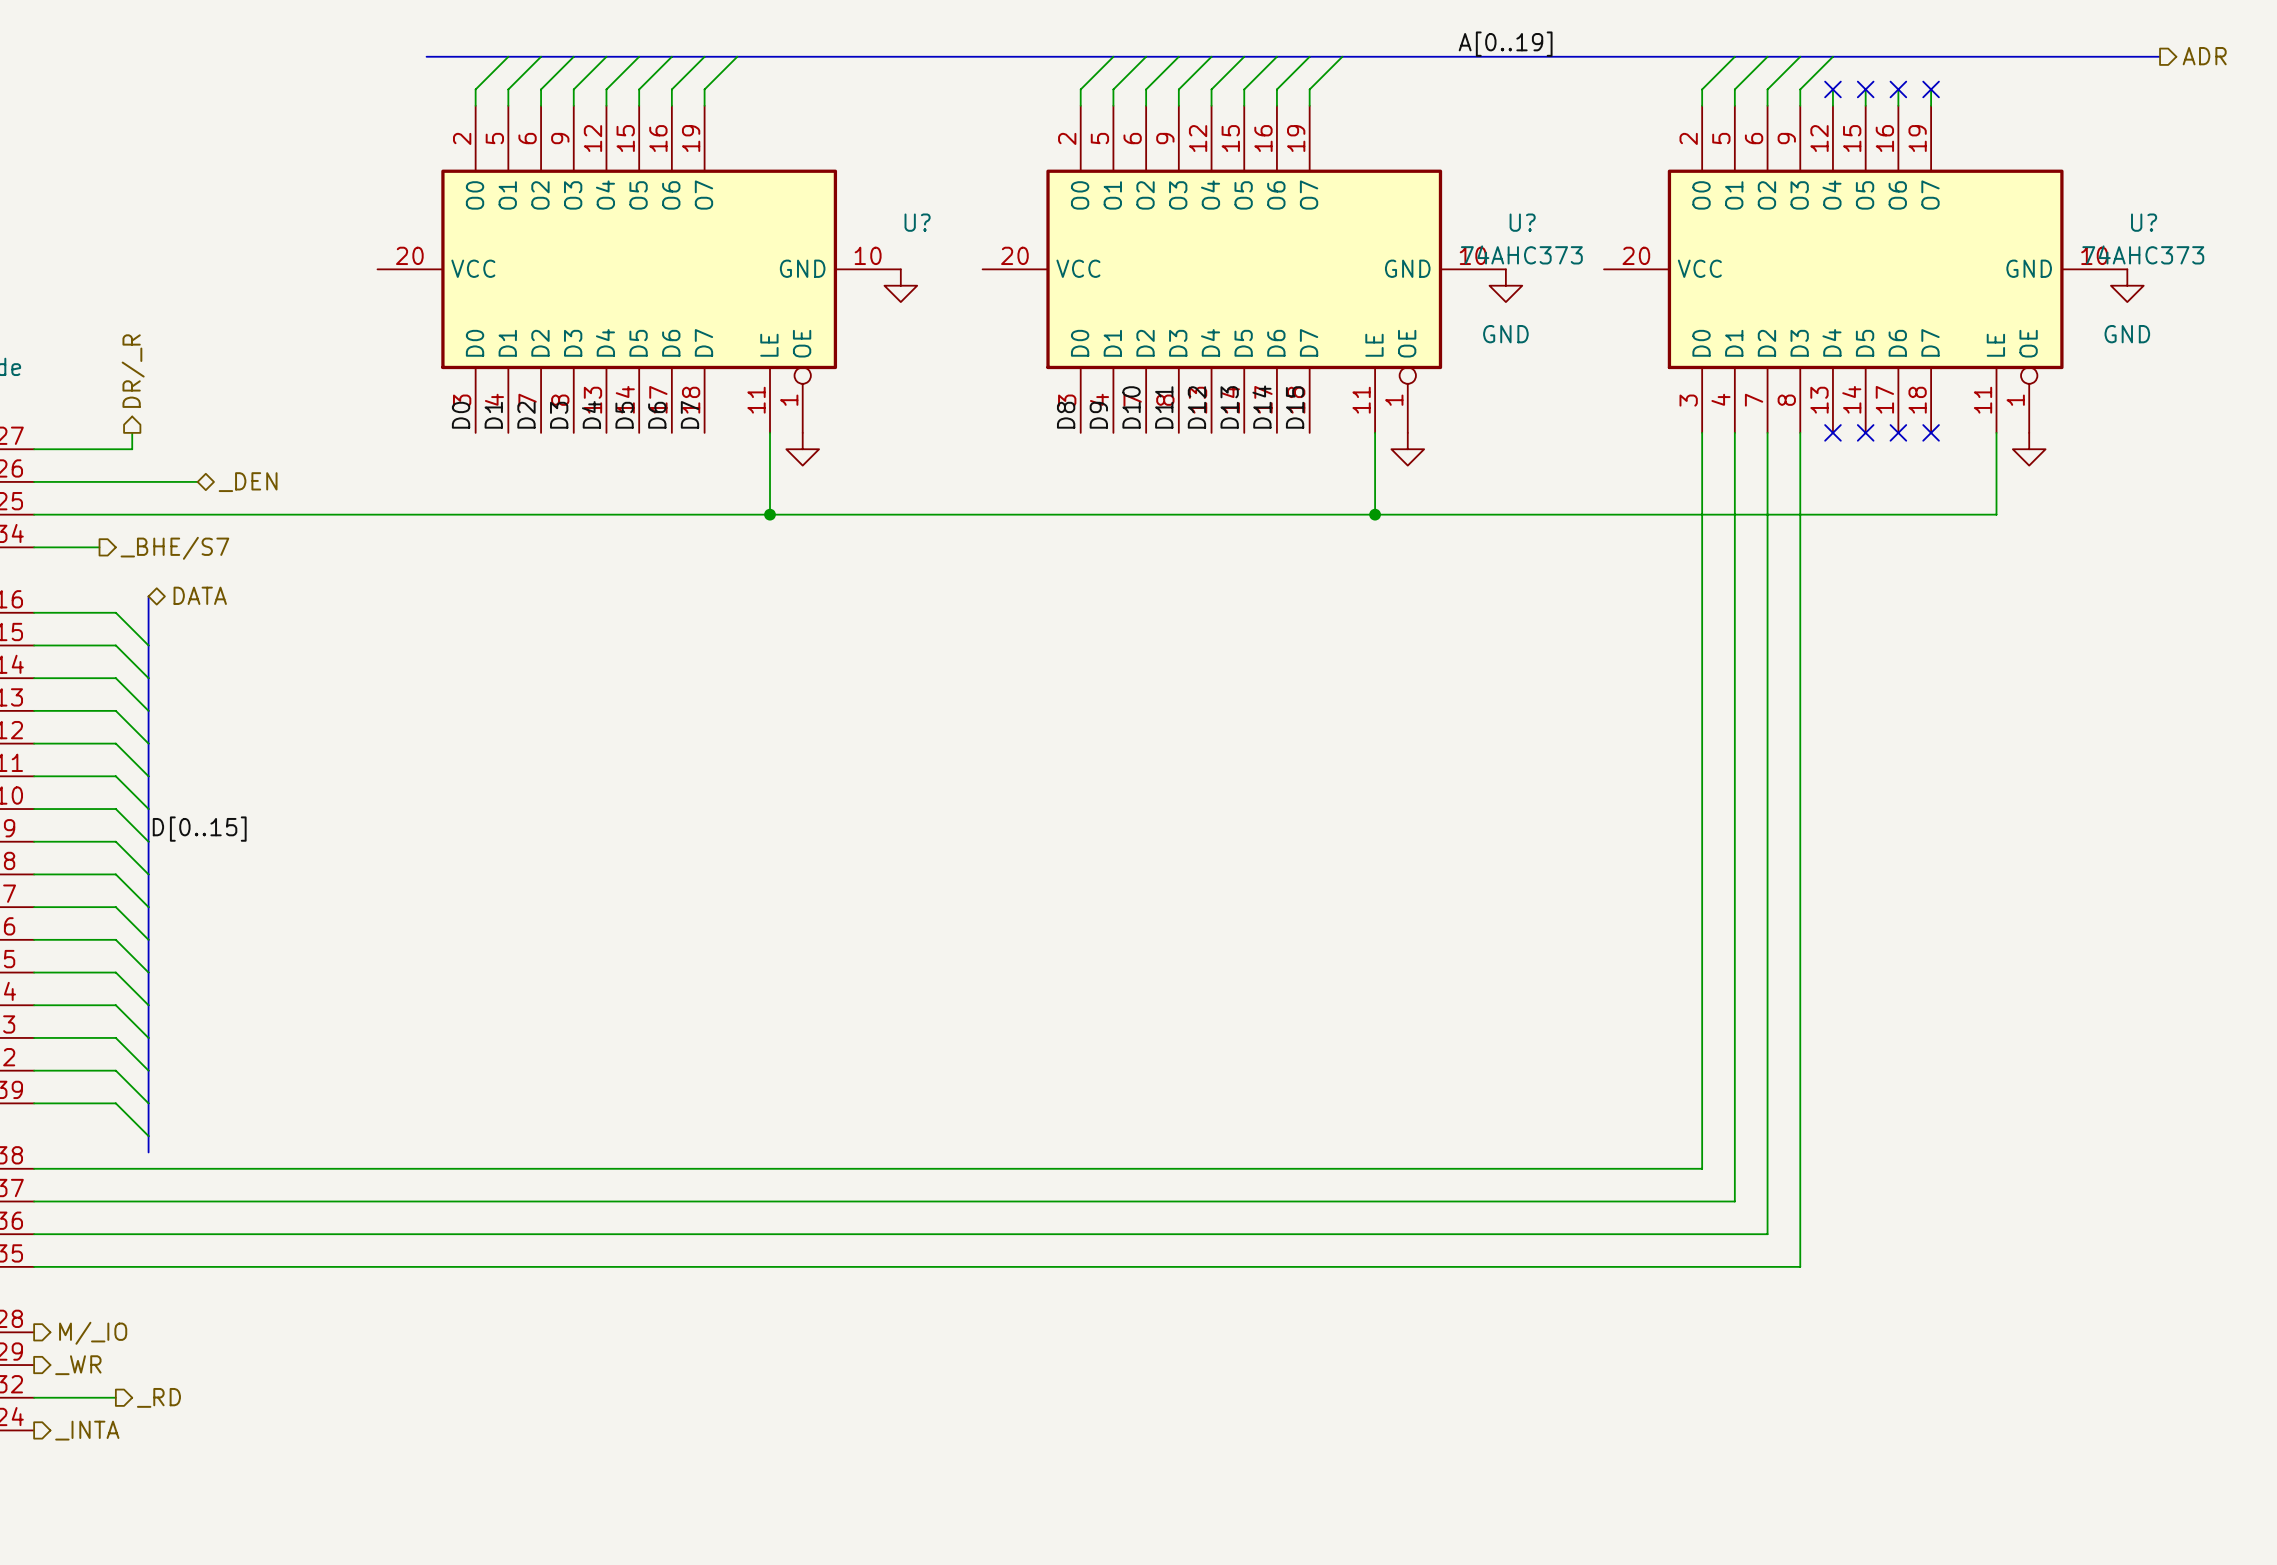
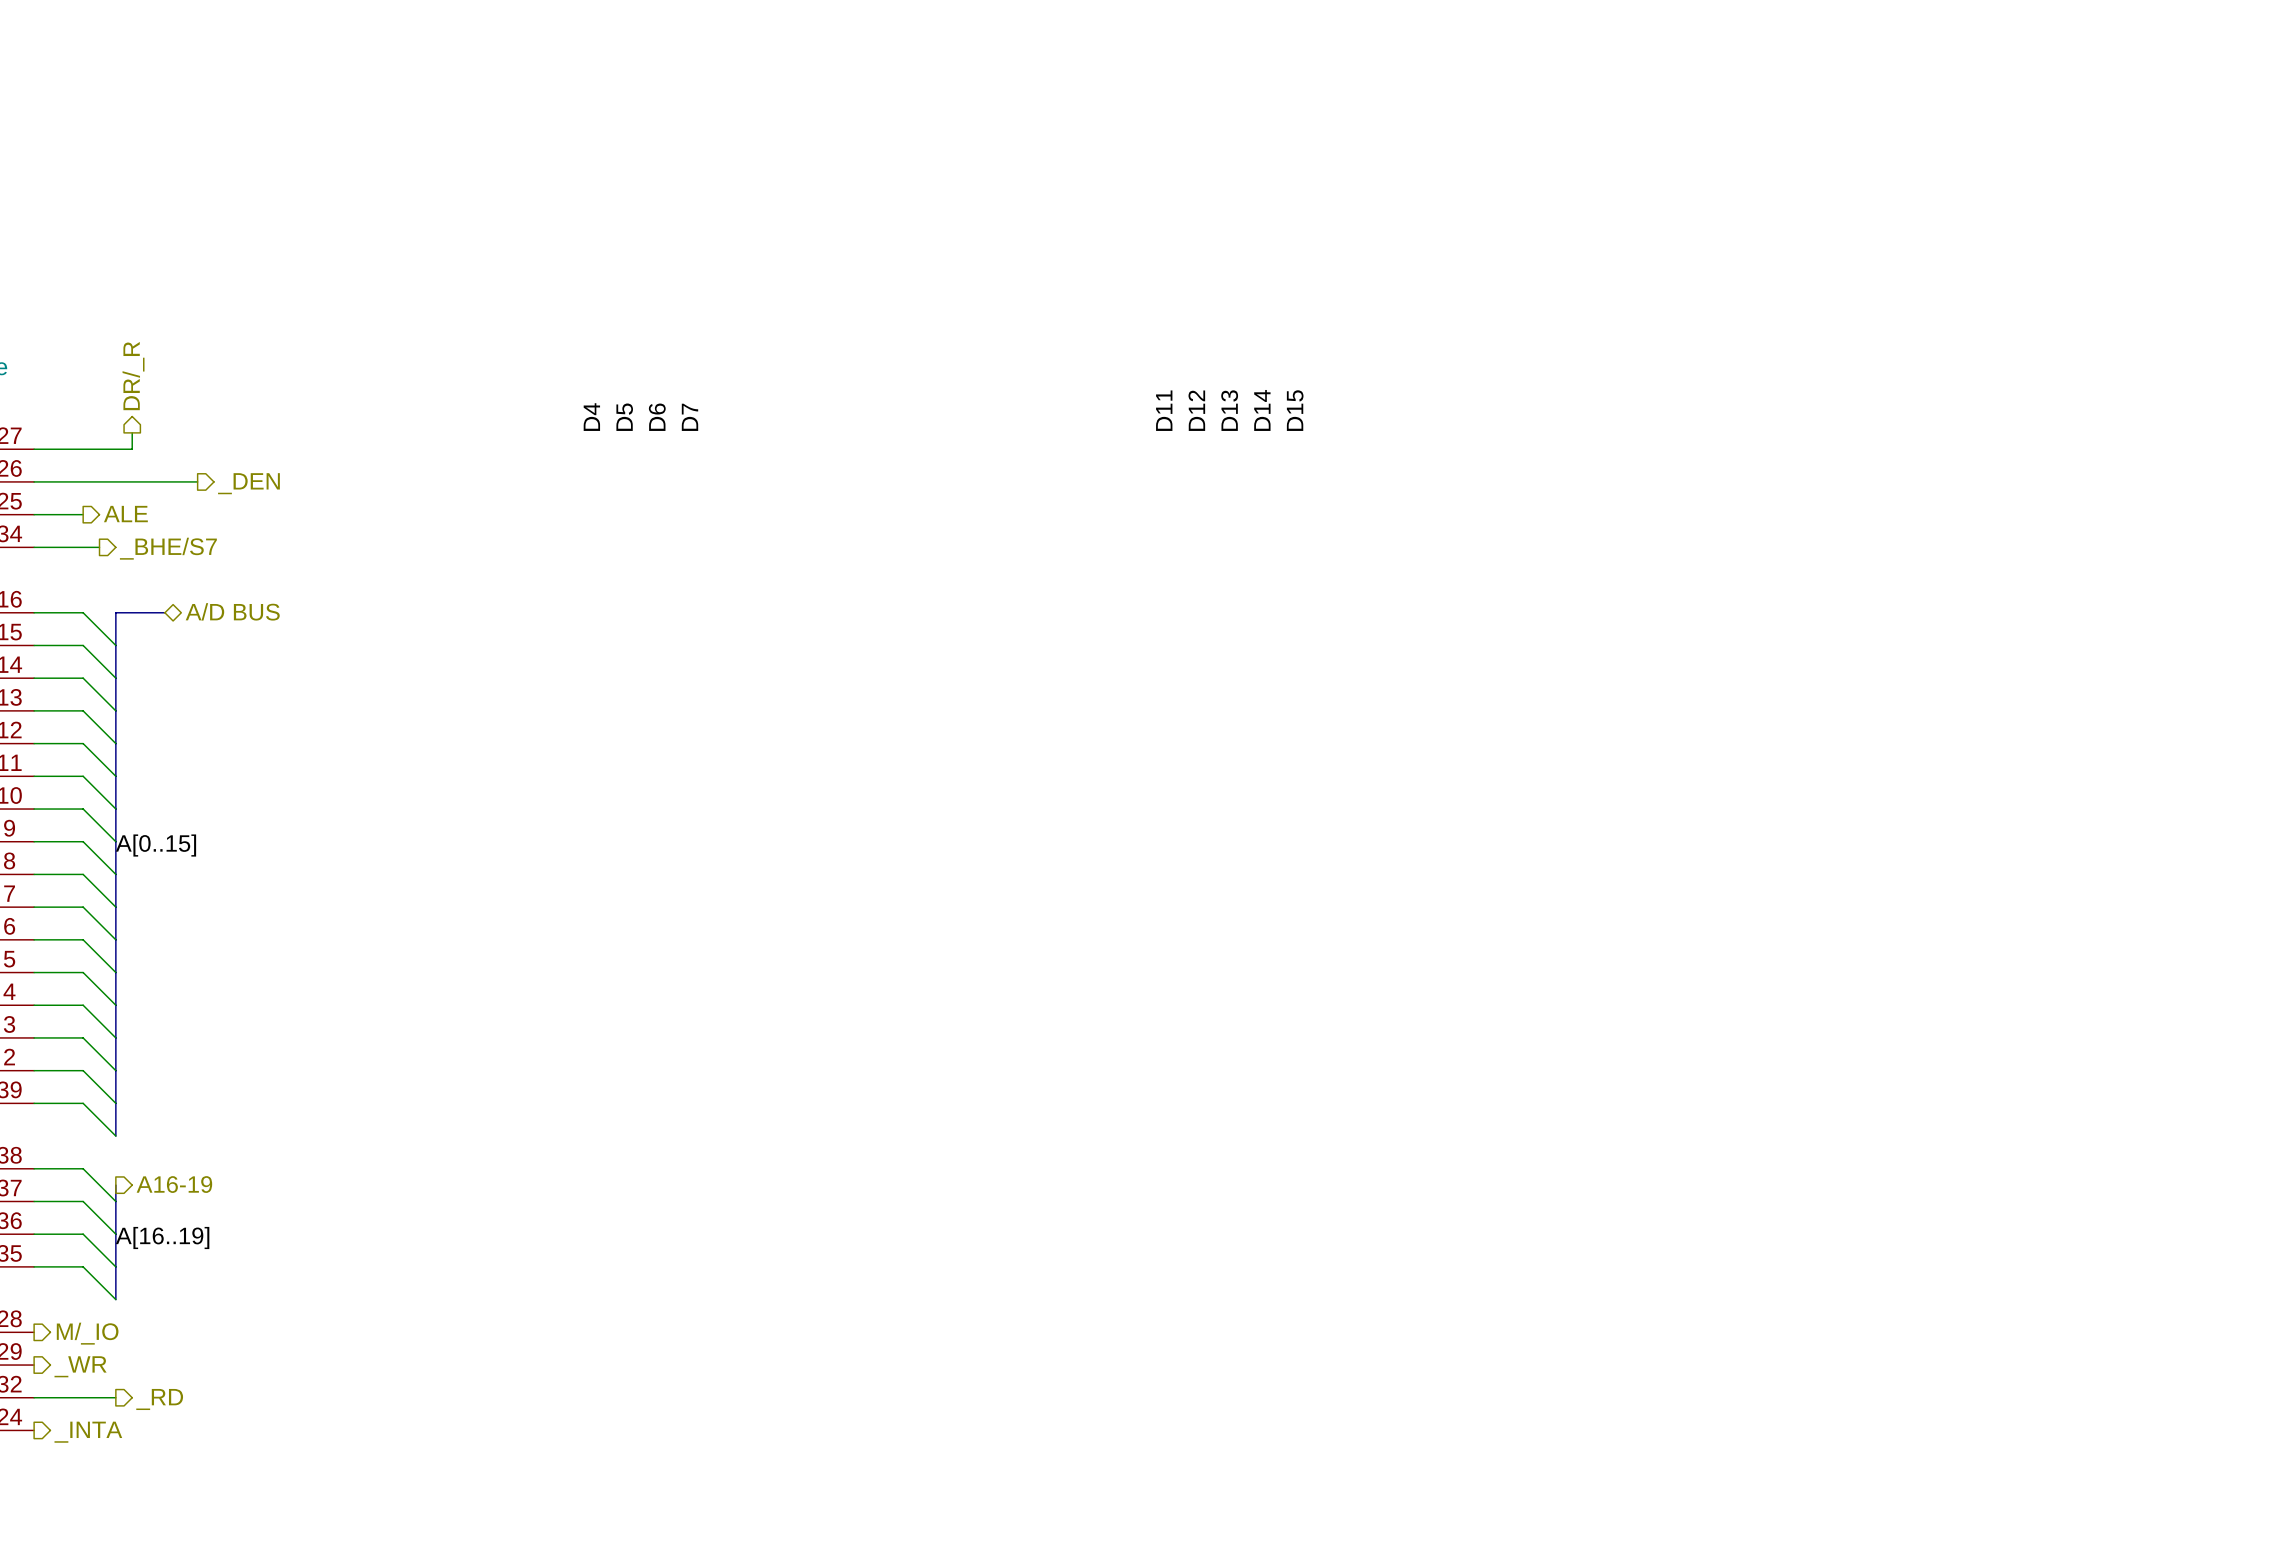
label: A[0..19] (1505, 44) -> none
bus: (426, 56) (2160, 56) -> none
wire: (508, 56) (475, 89) (475, 105) -> none
wire: (541, 56) (508, 89) (508, 105) -> none
wire: (573, 56) (541, 89) (541, 105) -> none
wire: (606, 56) (573, 89) (573, 105) -> none
wire: (639, 56) (606, 89) (606, 105) -> none
wire: (671, 56) (639, 89) (639, 105) -> none
wire: (704, 56) (671, 89) (671, 105) -> none
wire: (737, 56) (704, 89) (704, 105) -> none
wire: (1113, 56) (1080, 89) (1080, 105) -> none
wire: (1146, 56) (1113, 89) (1113, 105) -> none
wire: (1178, 56) (1146, 89) (1146, 105) -> none
wire: (1211, 56) (1178, 89) (1178, 105) -> none
wire: (1244, 56) (1211, 89) (1211, 105) -> none
wire: (1276, 56) (1244, 89) (1244, 105) -> none
wire: (1309, 56) (1276, 89) (1276, 105) -> none
wire: (1342, 56) (1309, 89) (1309, 105) -> none
wire: (1734, 56) (1702, 89) (1702, 105) -> none
wire: (1767, 56) (1734, 89) (1734, 105) -> none
wire: (1800, 56) (1767, 89) (1767, 105) -> none
wire: (1832, 56) (1800, 89) (1800, 105) -> none
hierarchical label: ADR (2204, 56) -> none
wire: (1832, 89) (1832, 105) -> none
no-connect mark: (1832, 89) -> none
wire: (1865, 89) (1865, 105) -> none
no-connect mark: (1865, 89) -> none
wire: (1898, 89) (1898, 105) -> none
no-connect mark: (1898, 89) -> none
wire: (1931, 89) (1931, 105) -> none
no-connect mark: (1931, 89) -> none
U?: (639, 269) -> none
U?: 74AHC373 (1244, 269) -> none
U?: 74AHC373 (1865, 269) -> none
power symbol: (900, 285) -> none
power symbol: GND (1505, 285) -> none
power symbol: GND (2127, 285) -> none
label: D10 (1131, 407) -> none
label: D0 (461, 415) -> none
label: D1 (493, 415) -> none
label: D2 (526, 415) -> none
label: D3 (559, 415) -> none
label: D8 (1066, 415) -> none
label: D9 (1098, 415) -> none
wire: (770, 432) (770, 514) -> none
wire: (1375, 432) (1375, 514) -> none
wire: (1702, 432) (1702, 1168) (83, 1168) -> (115, 1201) (83, 1168)
wire: (1734, 432) (1734, 1201) (83, 1201) -> (115, 1234) (83, 1201)
wire: (1767, 432) (1767, 1234) (83, 1234) -> (115, 1266) (83, 1234)
wire: (1800, 432) (1800, 1266) (83, 1266) -> (115, 1299) (83, 1266)
no-connect mark: (1832, 432) -> none
no-connect mark: (1865, 432) -> none
no-connect mark: (1898, 432) -> none
no-connect mark: (1931, 432) -> none
wire: (1996, 432) (1996, 514) (83, 514) -> none
power symbol: (802, 449) -> none
power symbol: (1407, 449) -> none
power symbol: (2029, 449) -> none
hierarchical label shape: bidirectional (248, 482) -> output (248, 483)
hierarchical label: none -> ALE (125, 514)
junction: (770, 514) -> none
junction: (1375, 514) -> none
hierarchical label: DATA (200, 595) -> none
bus: (148, 596) (148, 1152) -> none
wire: (83, 612) (115, 612) (148, 645) -> (83, 612) (115, 645)
bus: none -> (164, 612) (115, 612) (115, 1136)
hierarchical label: none -> A/D BUS (232, 611)
wire: (83, 645) (115, 645) (148, 678) -> (83, 645) (115, 678)
wire: (83, 678) (115, 678) (148, 710) -> (83, 678) (115, 710)
wire: (83, 710) (115, 710) (148, 743) -> (83, 710) (115, 743)
wire: (83, 743) (115, 743) (148, 776) -> (83, 743) (115, 776)
wire: (83, 776) (115, 776) (148, 809) -> (83, 776) (115, 809)
wire: (83, 809) (115, 809) (148, 841) -> (83, 809) (115, 841)
label: D[0..15] (199, 829) -> A[0..15] (156, 845)
wire: (83, 841) (115, 841) (148, 874) -> (83, 841) (115, 874)
wire: (83, 874) (115, 874) (148, 907) -> (83, 874) (115, 907)
wire: (83, 907) (115, 907) (148, 939) -> (83, 907) (115, 939)
wire: (83, 939) (115, 939) (148, 972) -> (83, 939) (115, 972)
wire: (83, 972) (115, 972) (148, 1005) -> (83, 972) (115, 1005)
wire: (83, 1005) (115, 1005) (148, 1037) -> (83, 1005) (115, 1037)
wire: (83, 1037) (115, 1037) (148, 1070) -> (83, 1037) (115, 1070)
wire: (83, 1070) (115, 1070) (148, 1103) -> (83, 1070) (115, 1103)
wire: (83, 1103) (115, 1103) (148, 1136) -> (83, 1103) (115, 1136)
hierarchical label: none -> A16-19 (174, 1184)
bus: none -> (115, 1185) (115, 1299)
label: none -> A[16..19] (162, 1237)

